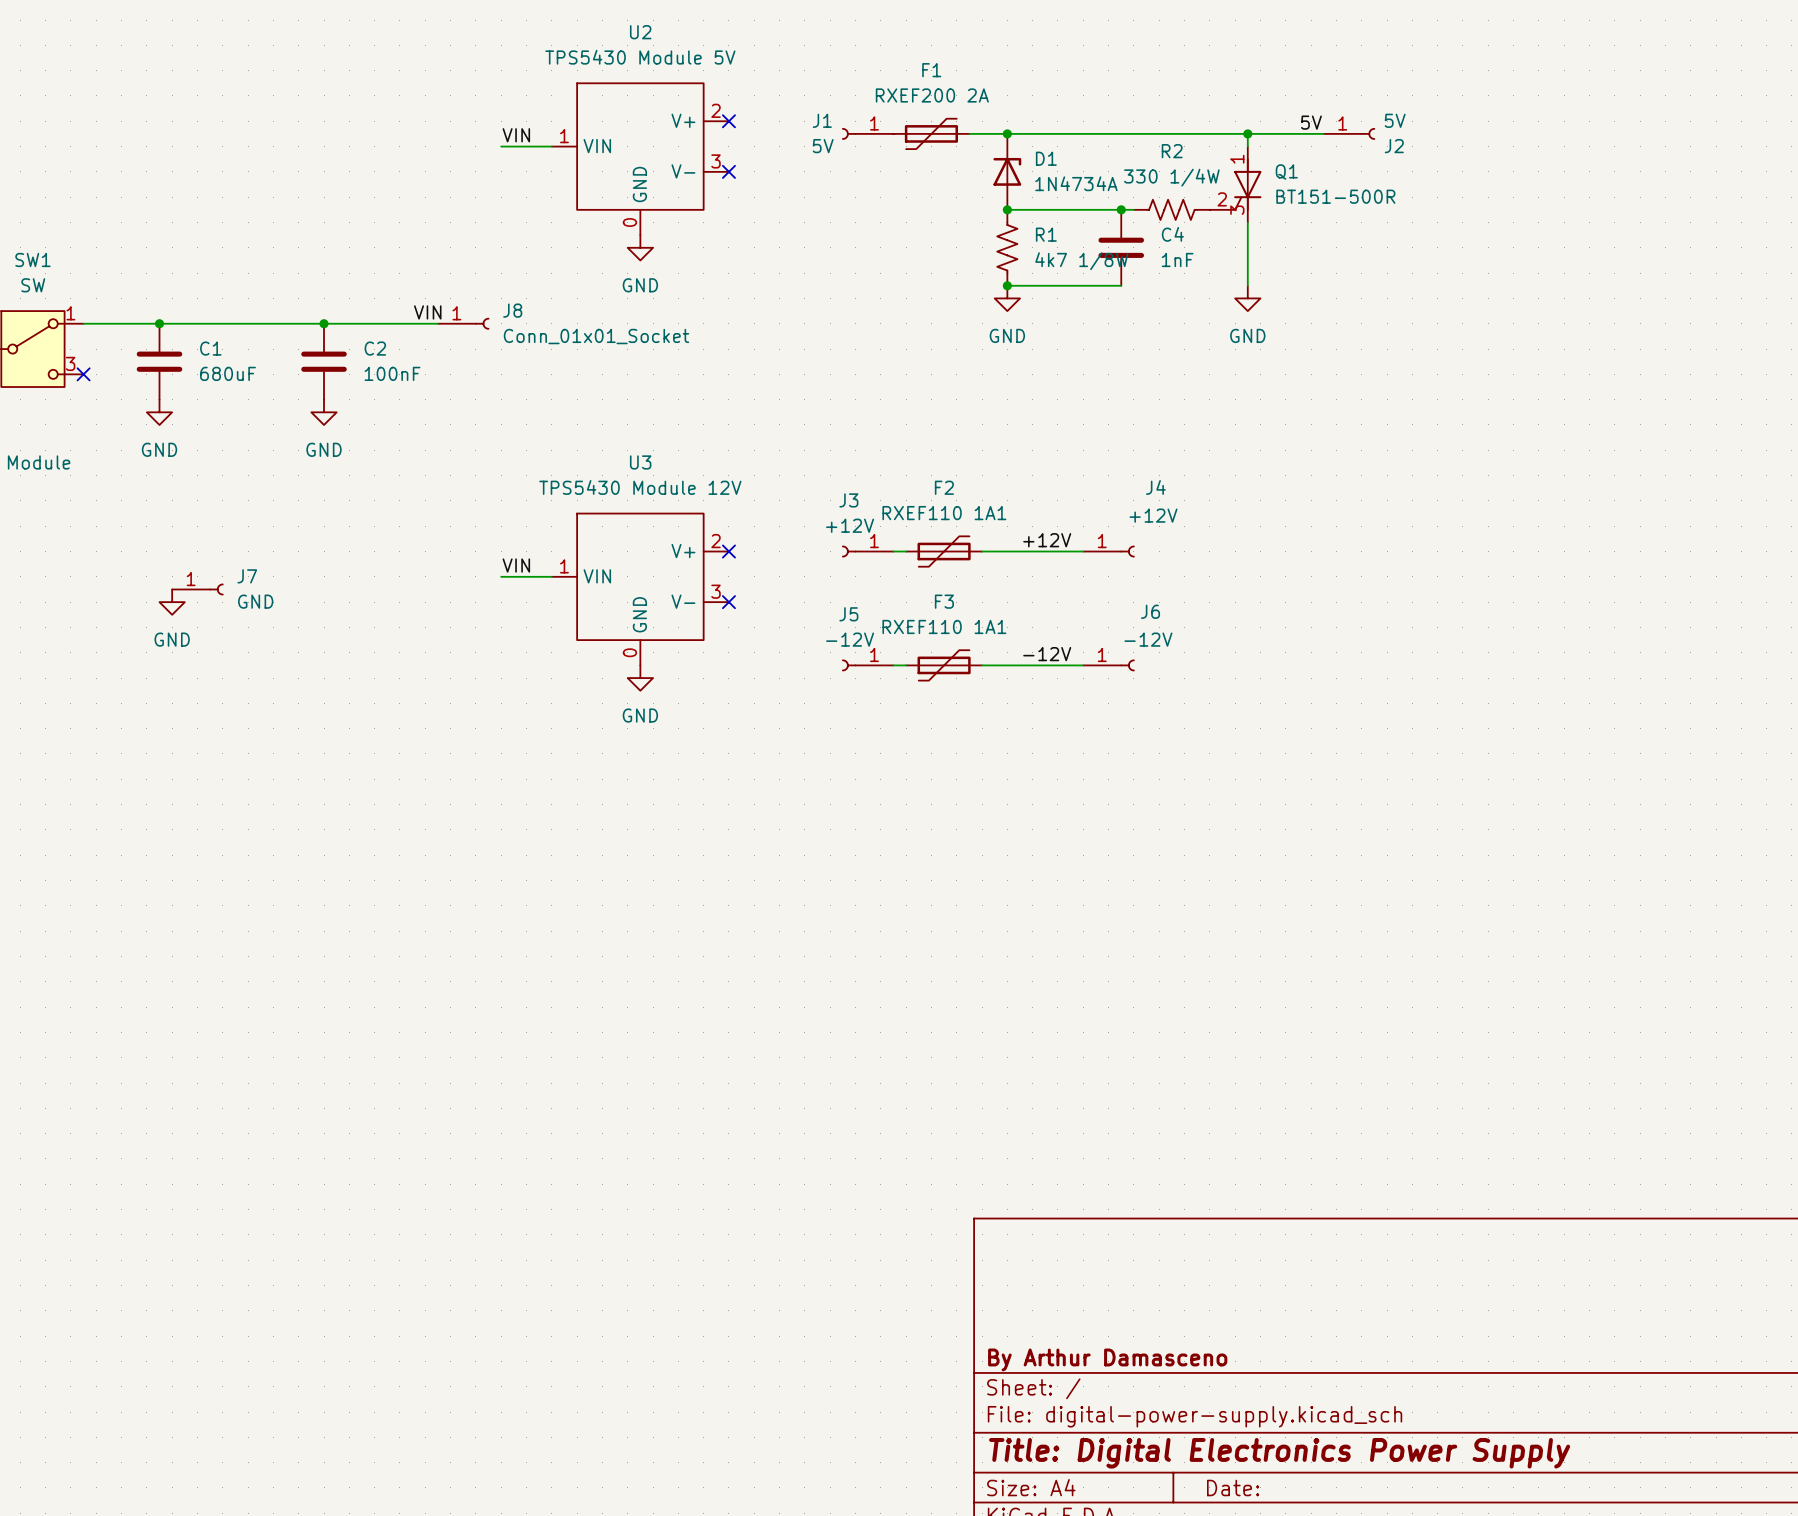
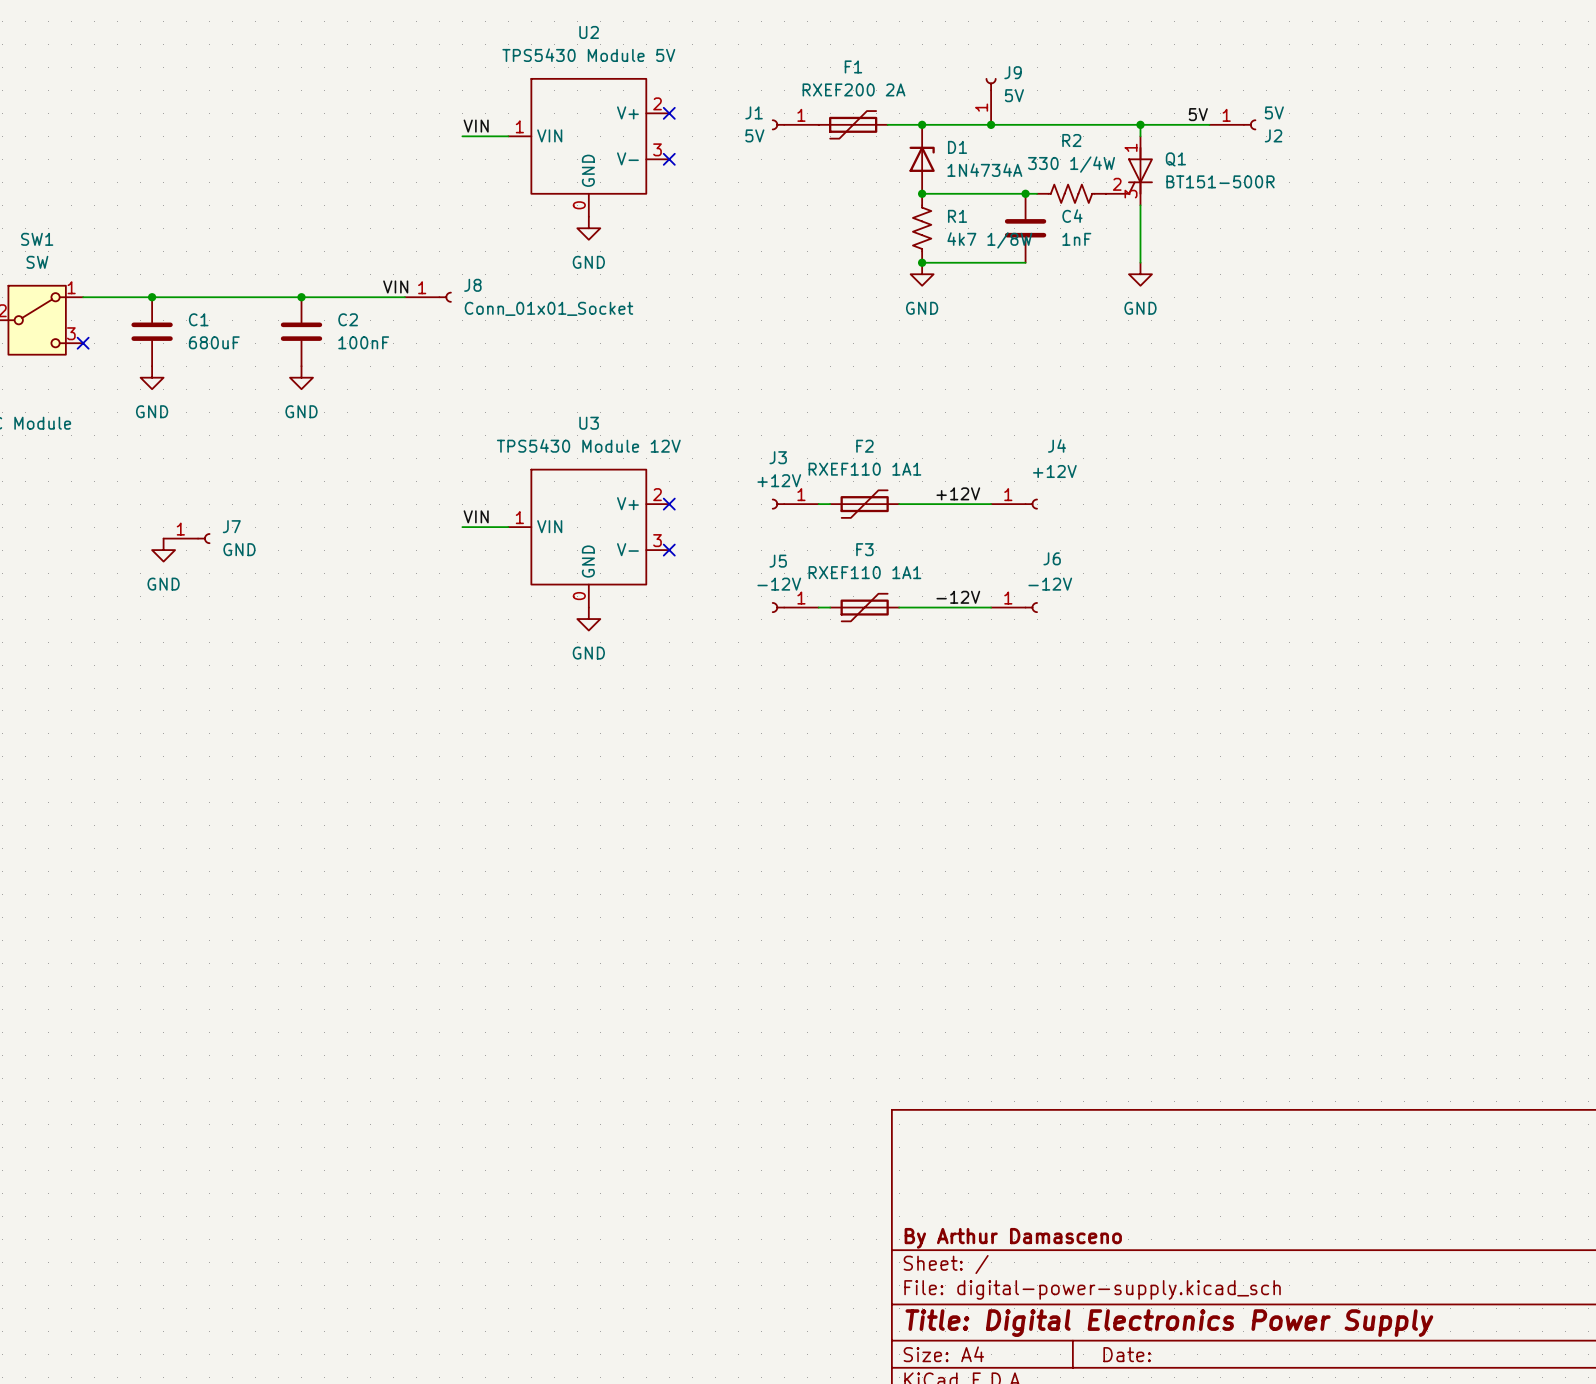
J9: none -> 5V (991, 101)
junction: none -> (991, 124)

